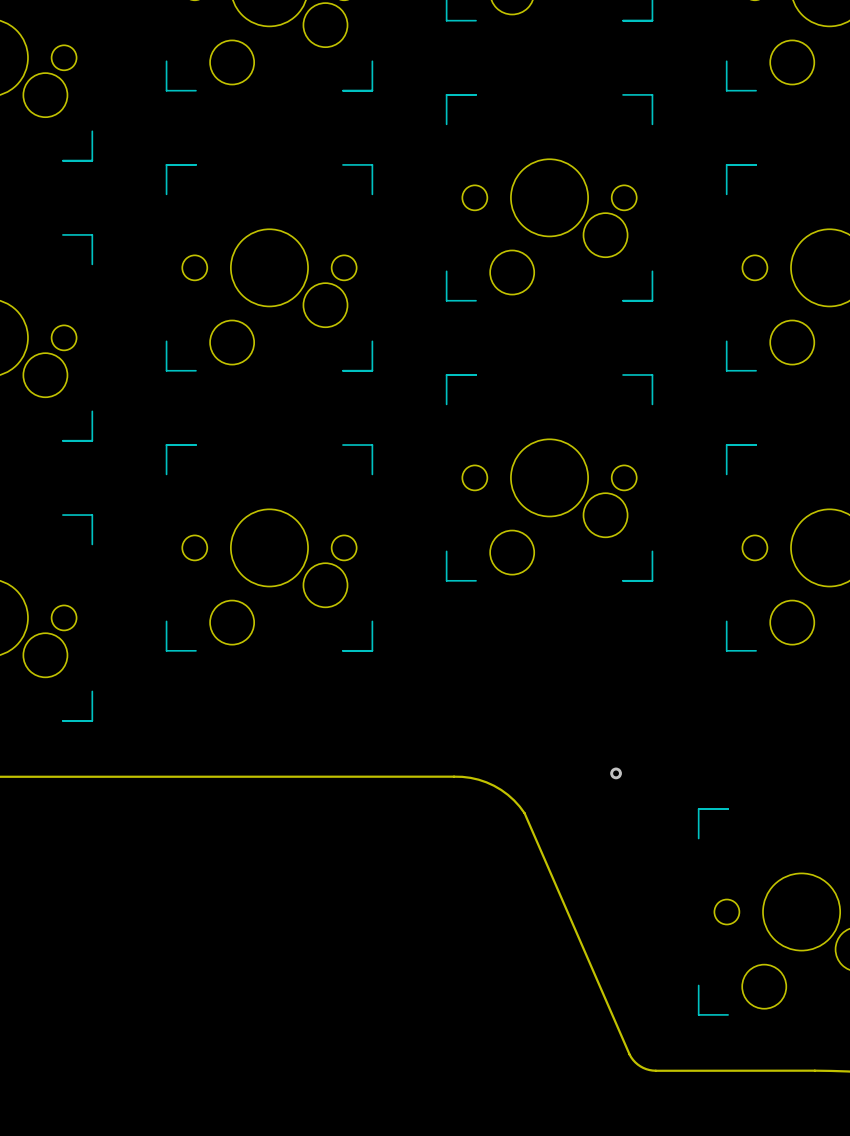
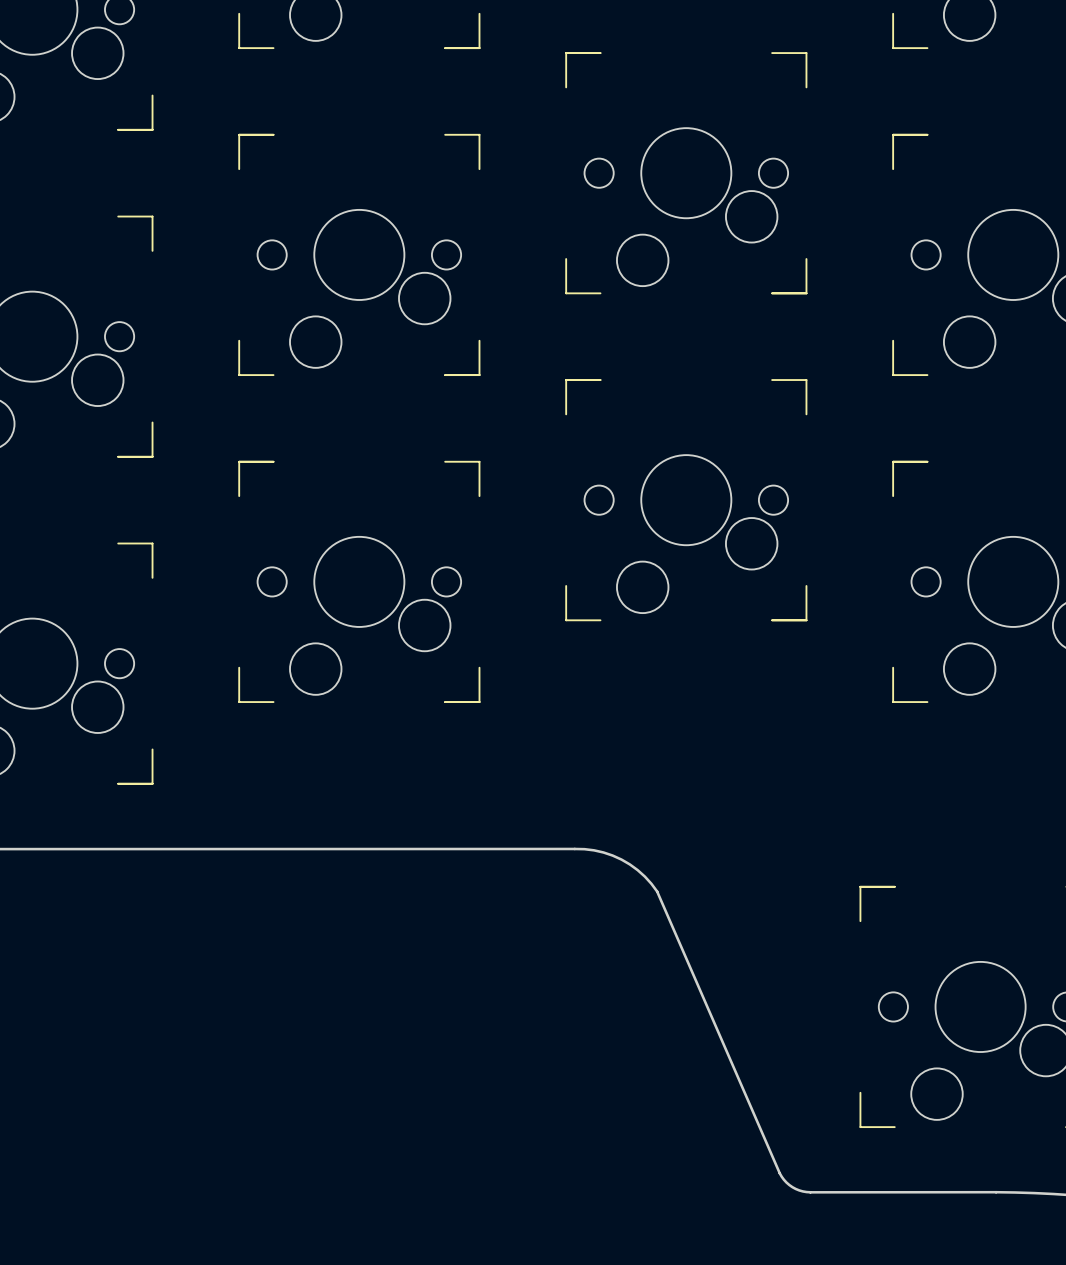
via: (616, 773) -> none

